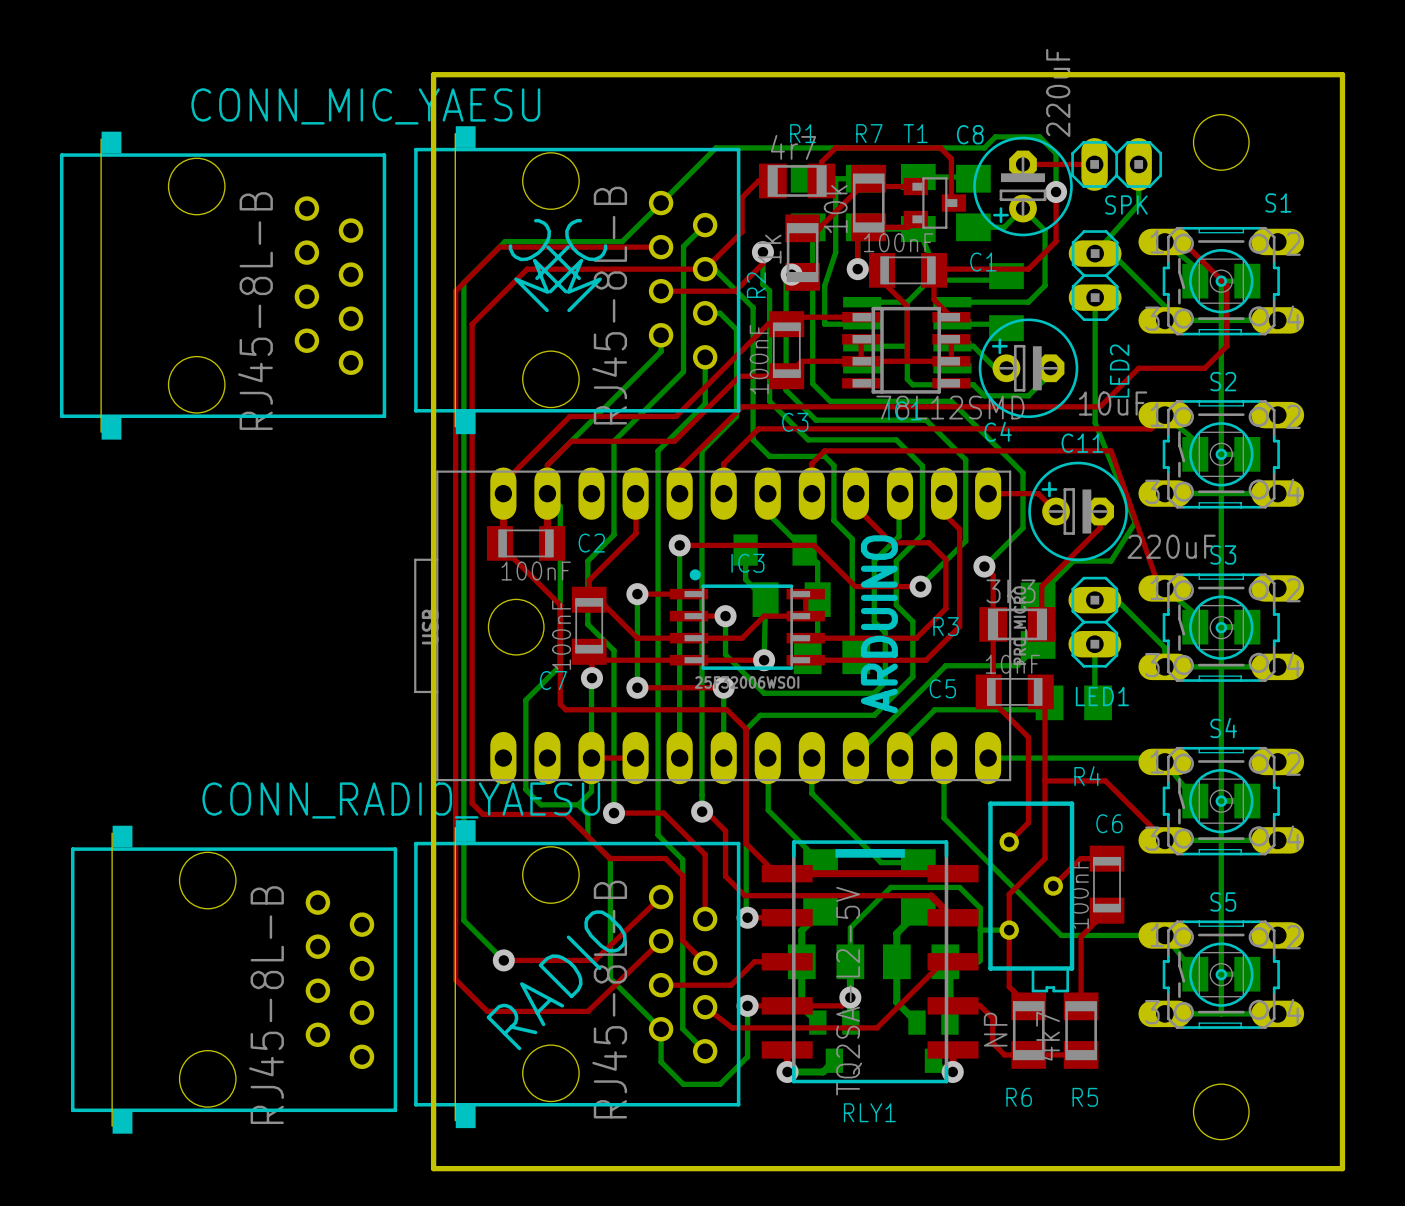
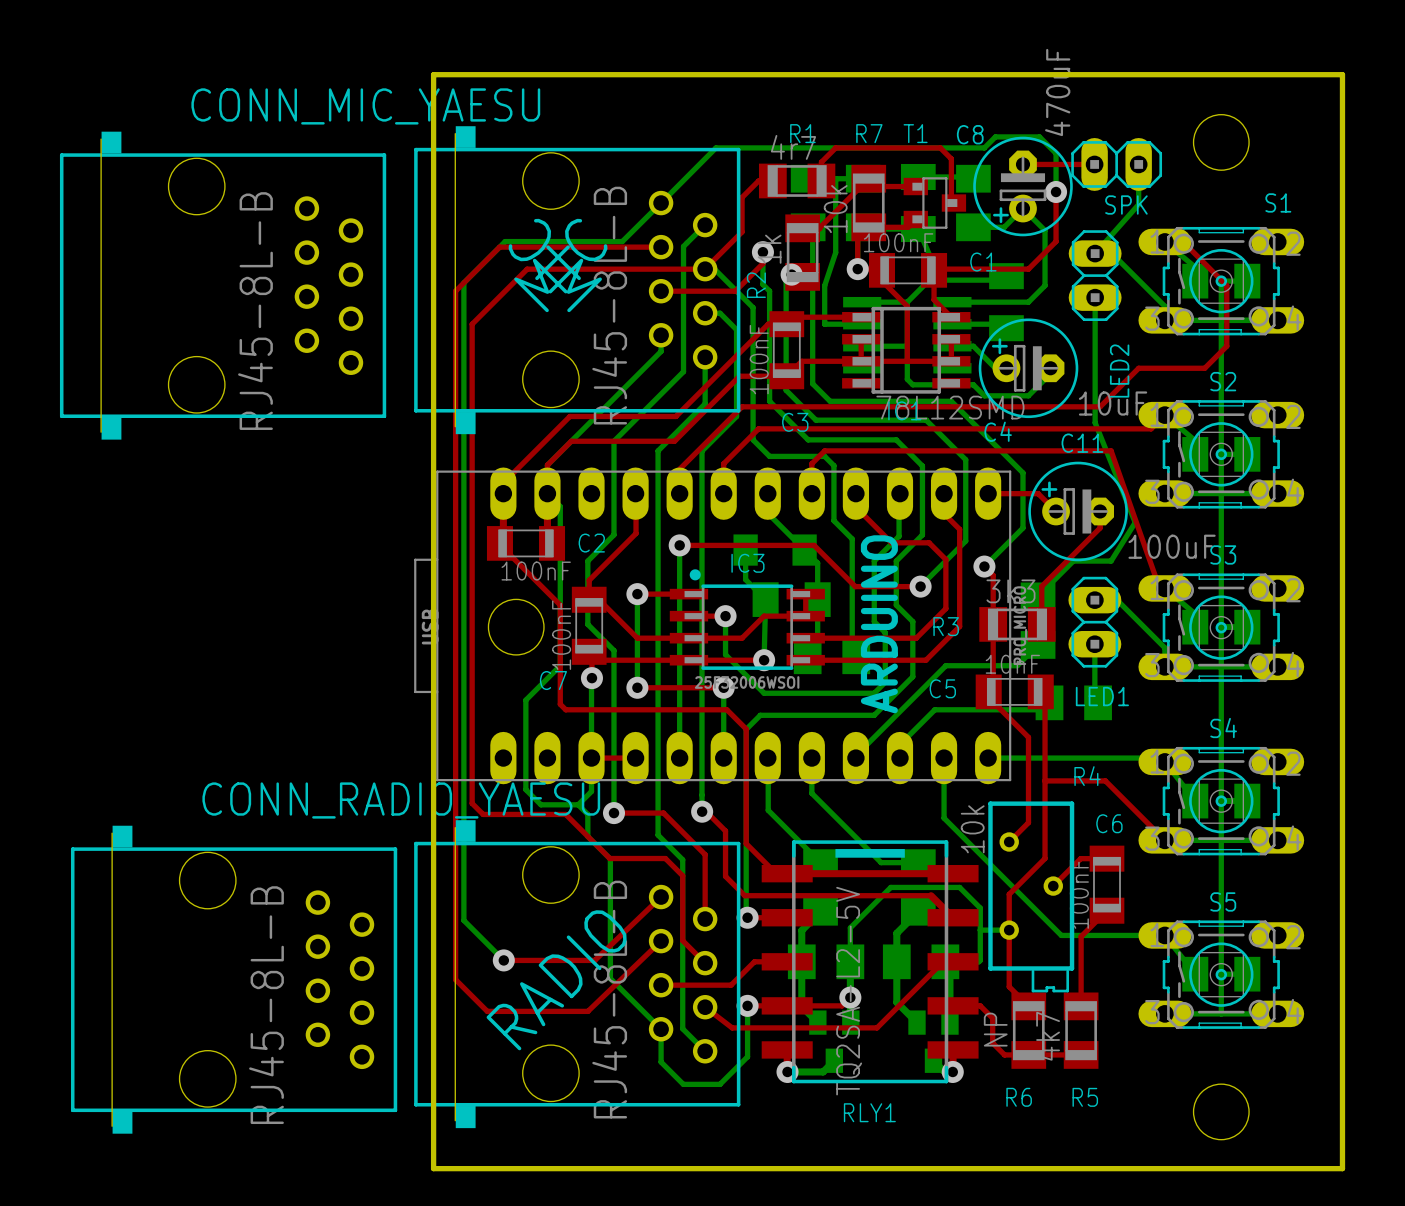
C8 value: 220uF (1058, 92) -> 470uF (1057, 92)
C11 value: 220uF (1171, 546) -> 100uF (1172, 546)
R4 value: none -> 10k (972, 829)

